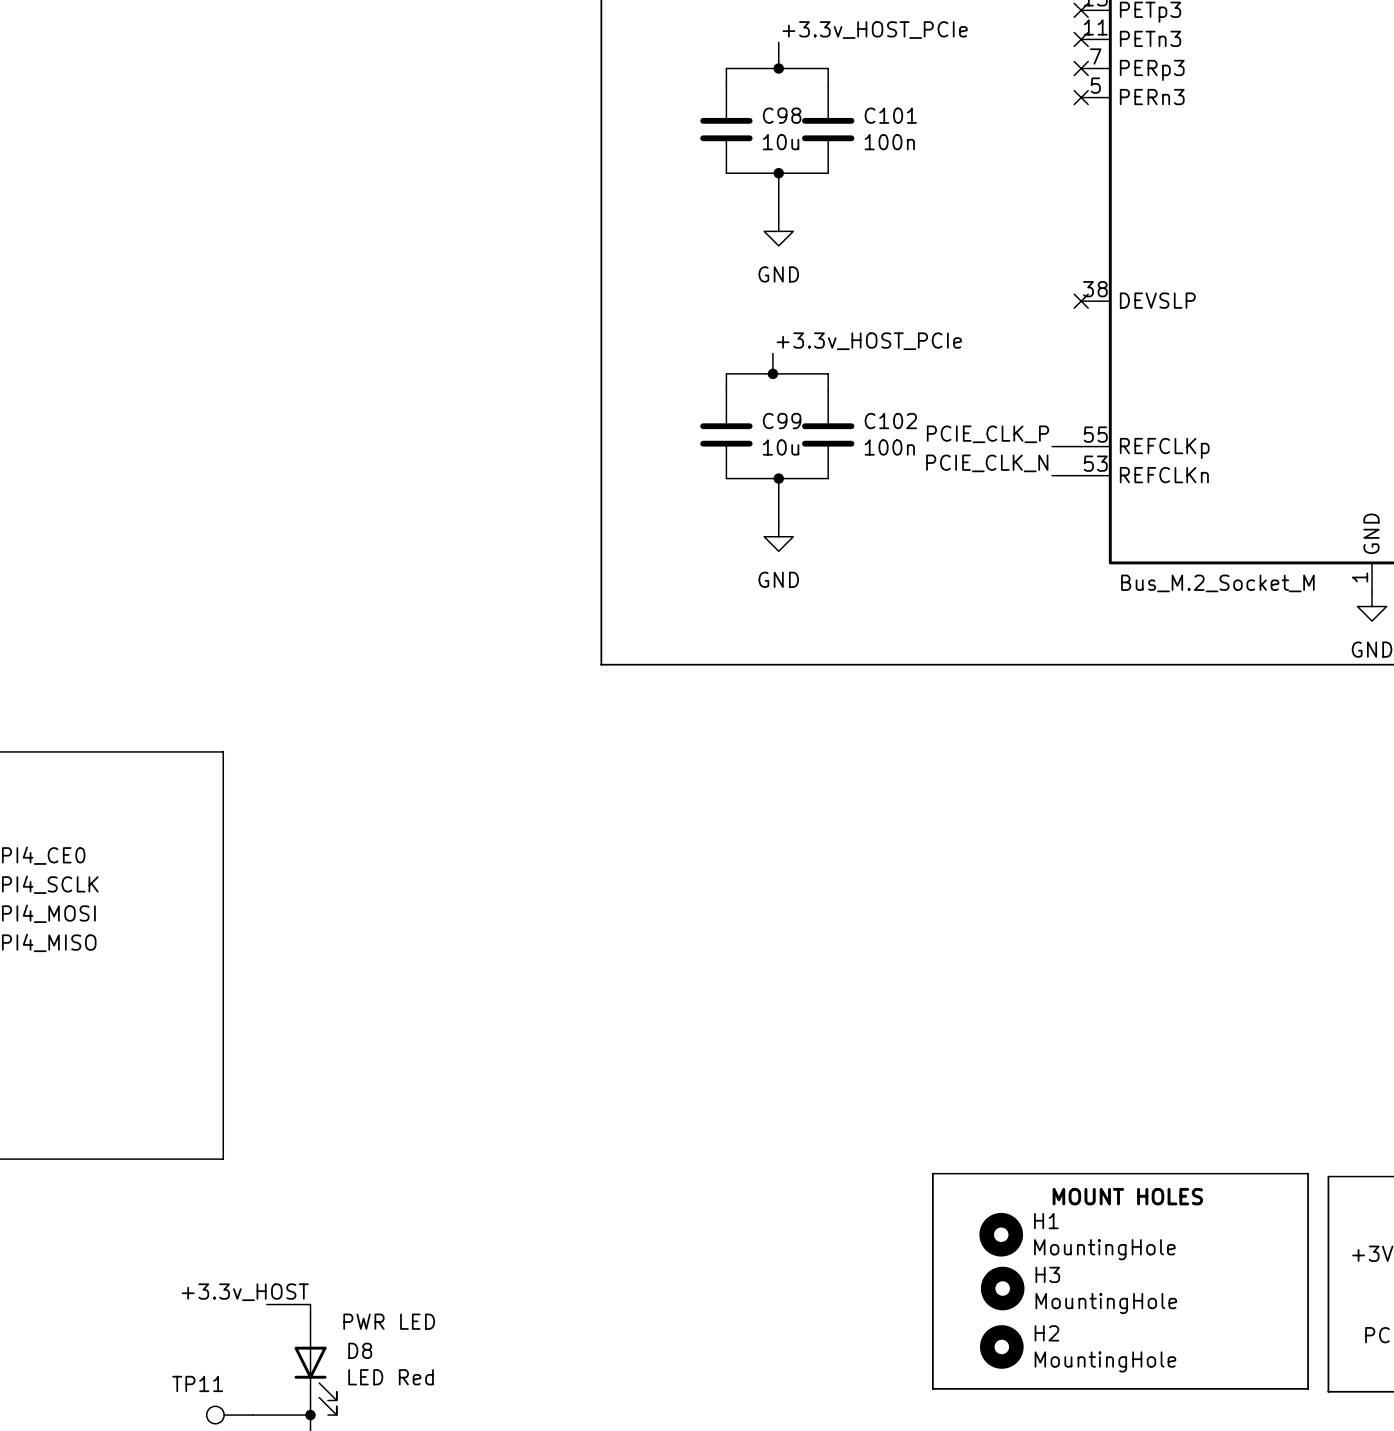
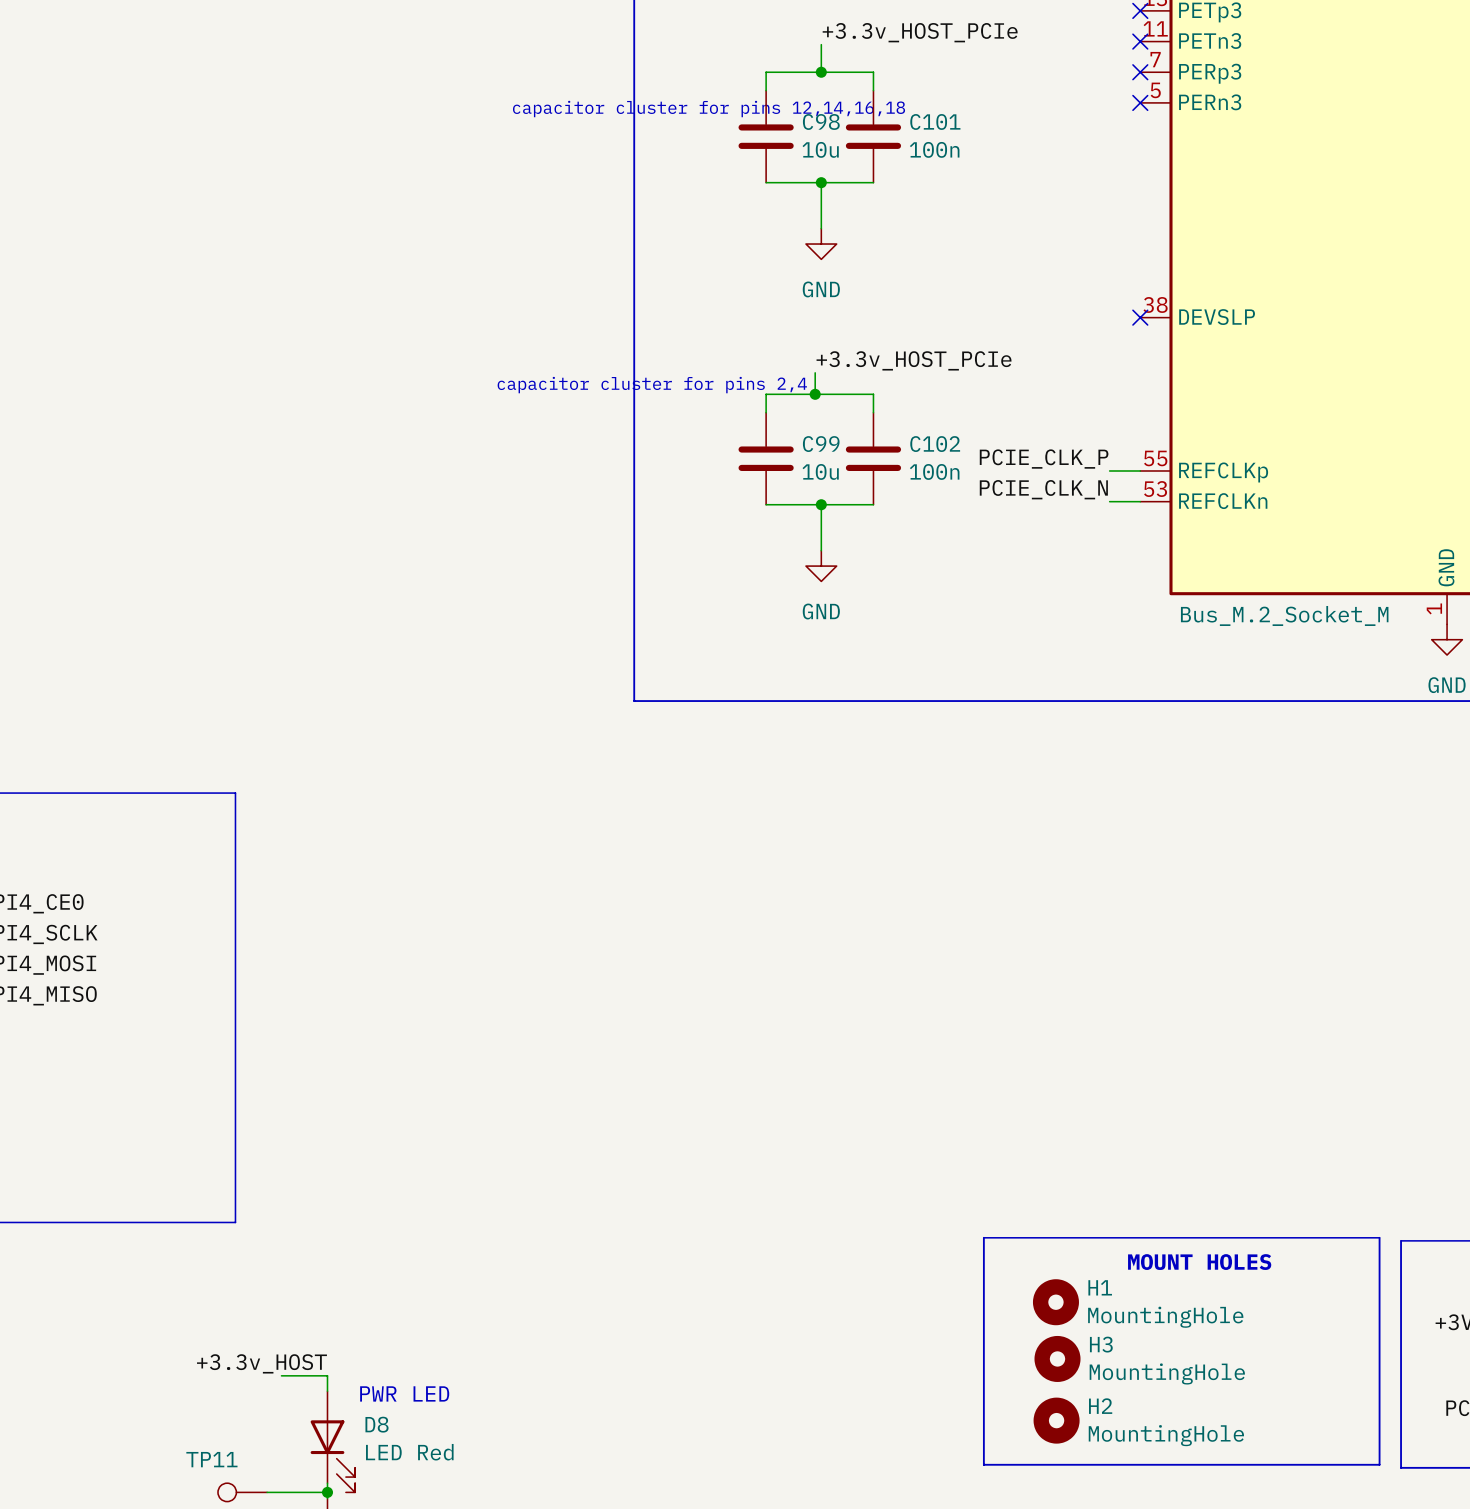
text: none -> capacitor cluster for pins 12,14,16,18 (709, 109)
text: none -> capacitor cluster for pins 2,4 (652, 385)

